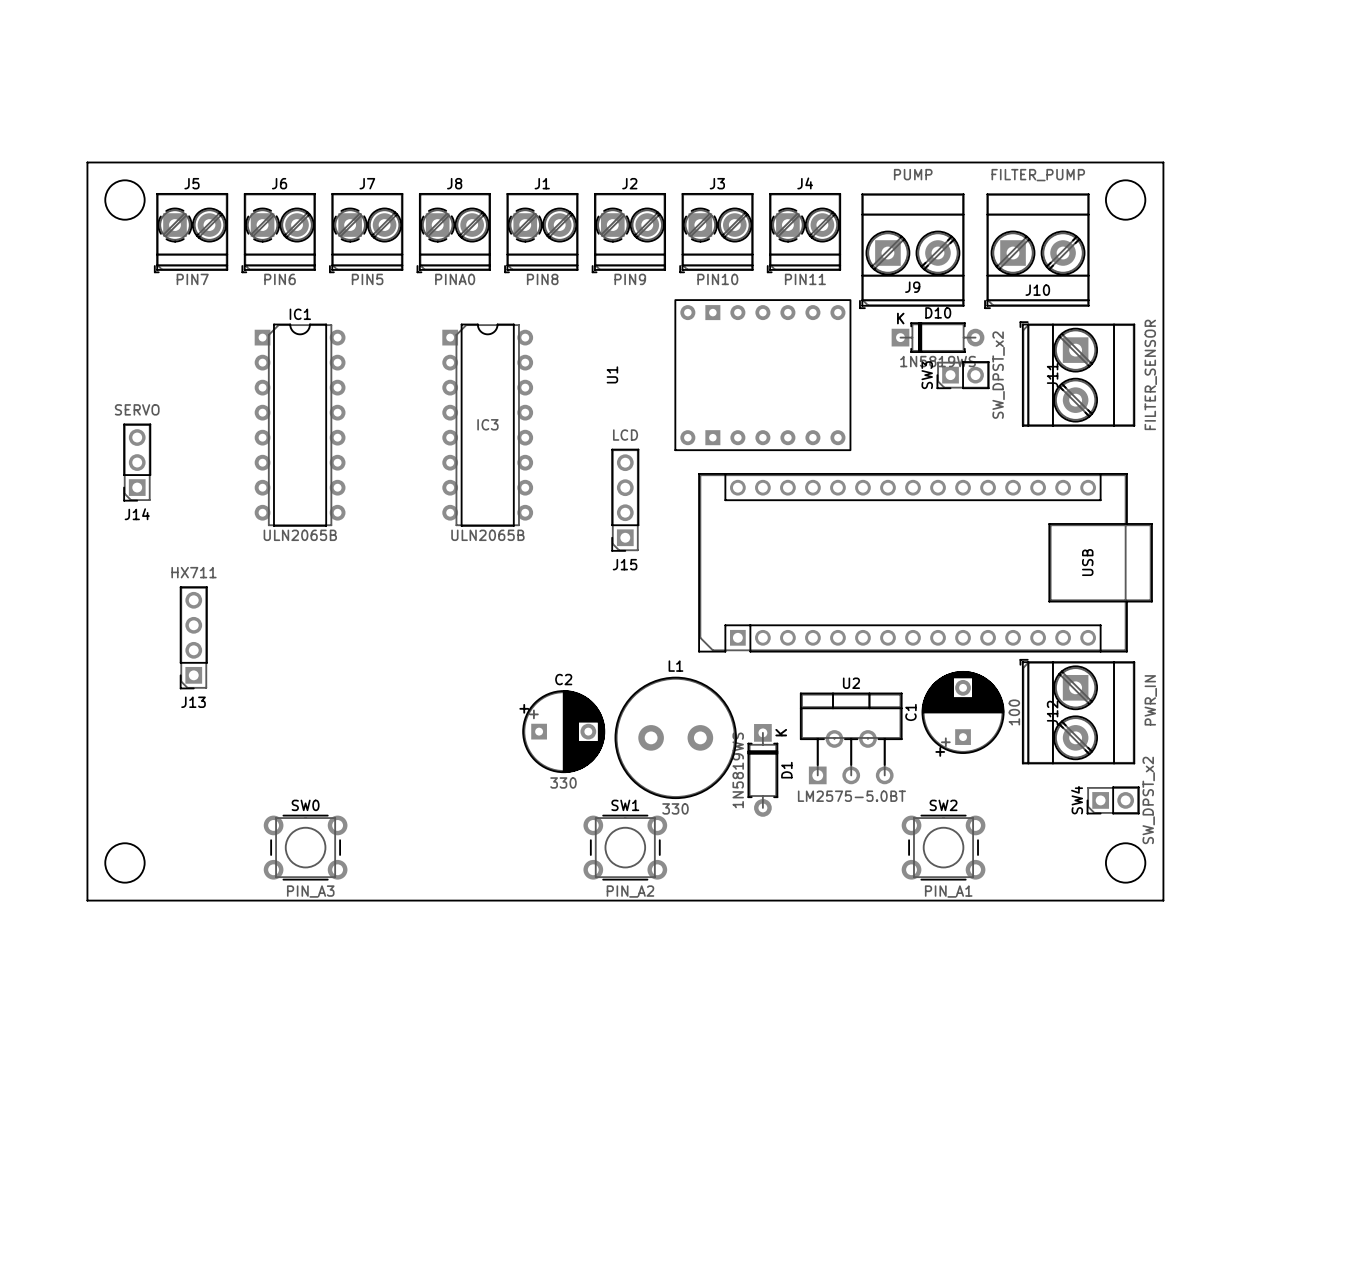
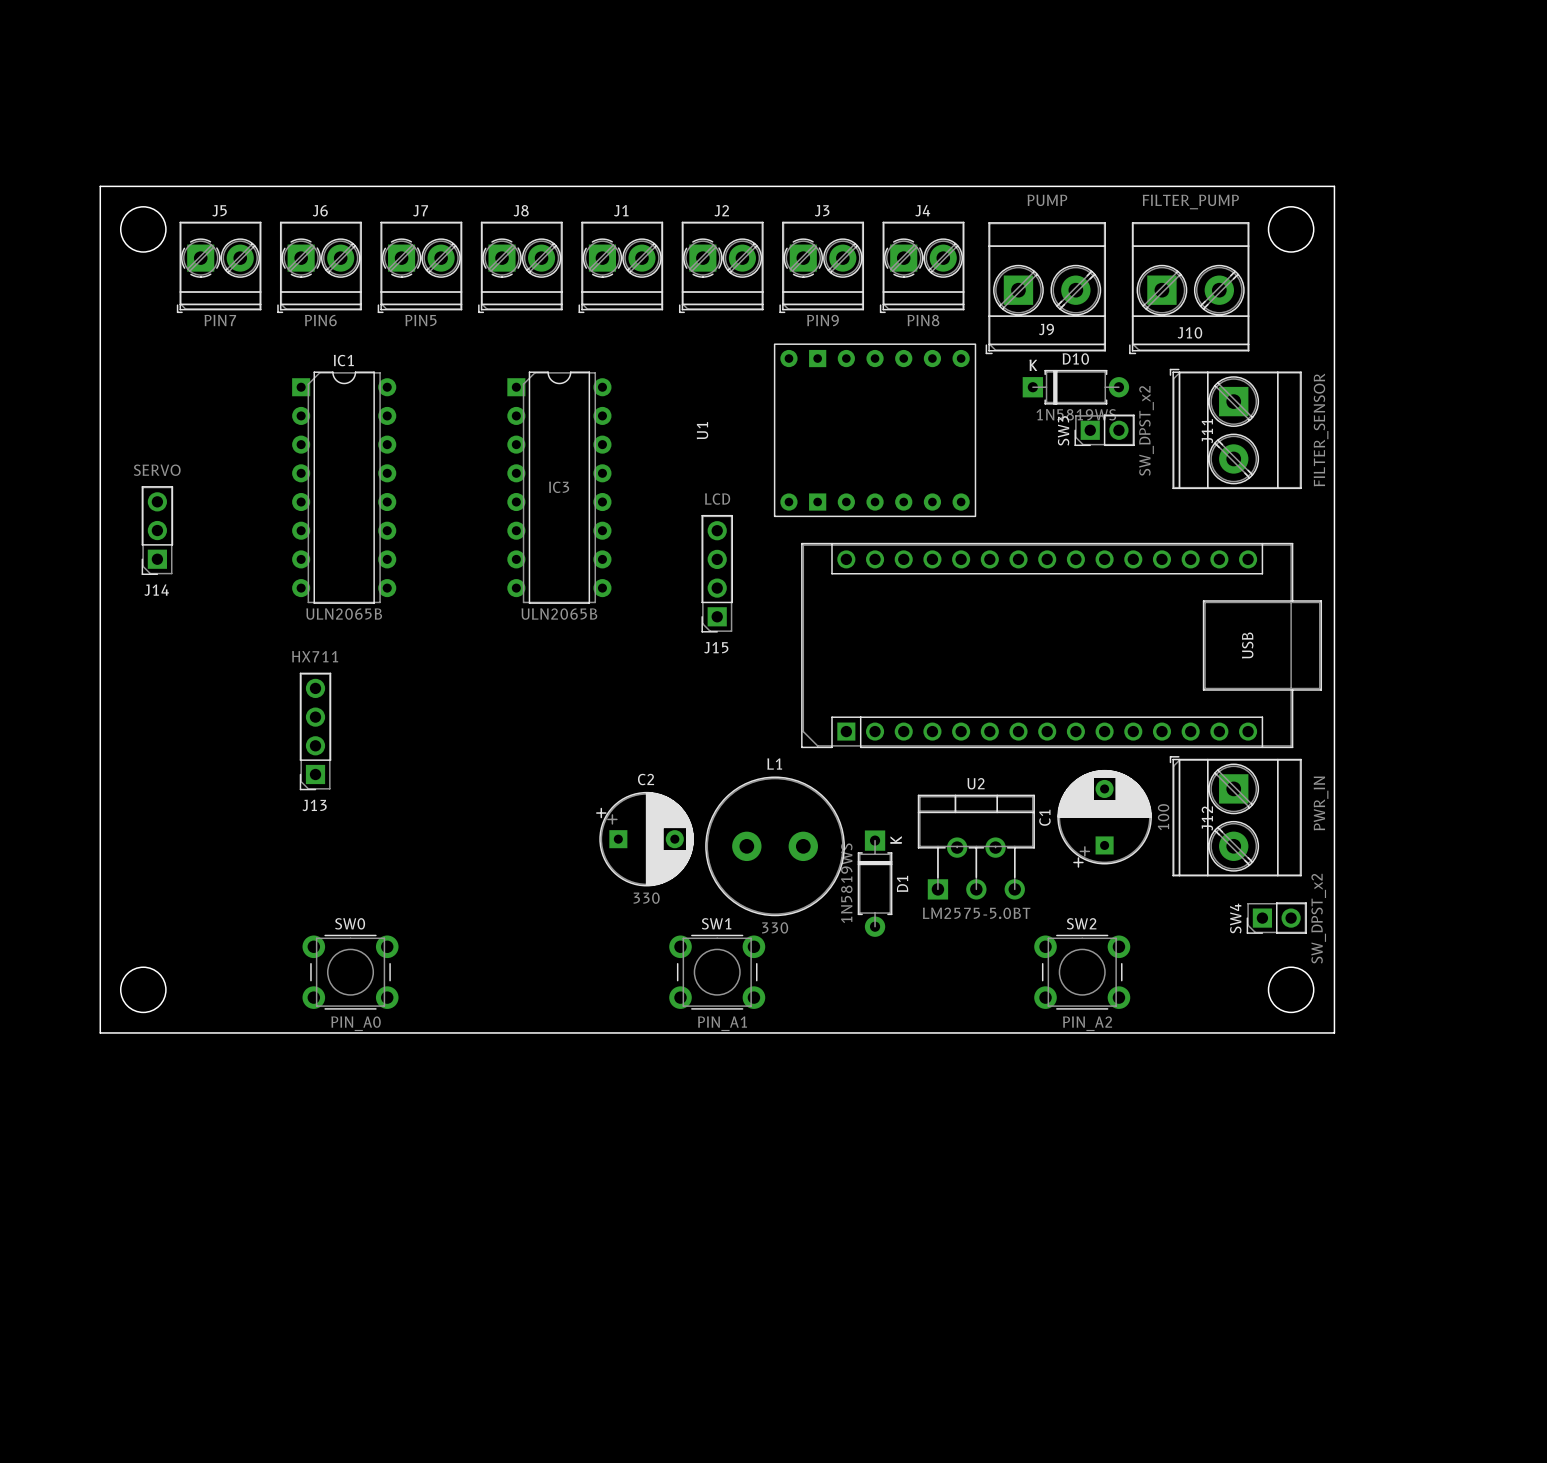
J8 value: PINA0 (455, 279) -> none
J1 value: PIN8 (542, 279) -> none
J2 value: PIN9 (630, 279) -> none
J3 value: PIN10 (717, 279) -> PIN9 (822, 320)
J4 value: PIN11 (805, 279) -> PIN8 (923, 320)
J13 position: (193, 637) -> (315, 731)
SW0 value: PIN_A3 (310, 891) -> PIN_A0 (356, 1023)
SW1 value: PIN_A2 (630, 891) -> PIN_A1 (722, 1023)
SW2 value: PIN_A1 (948, 891) -> PIN_A2 (1087, 1023)

